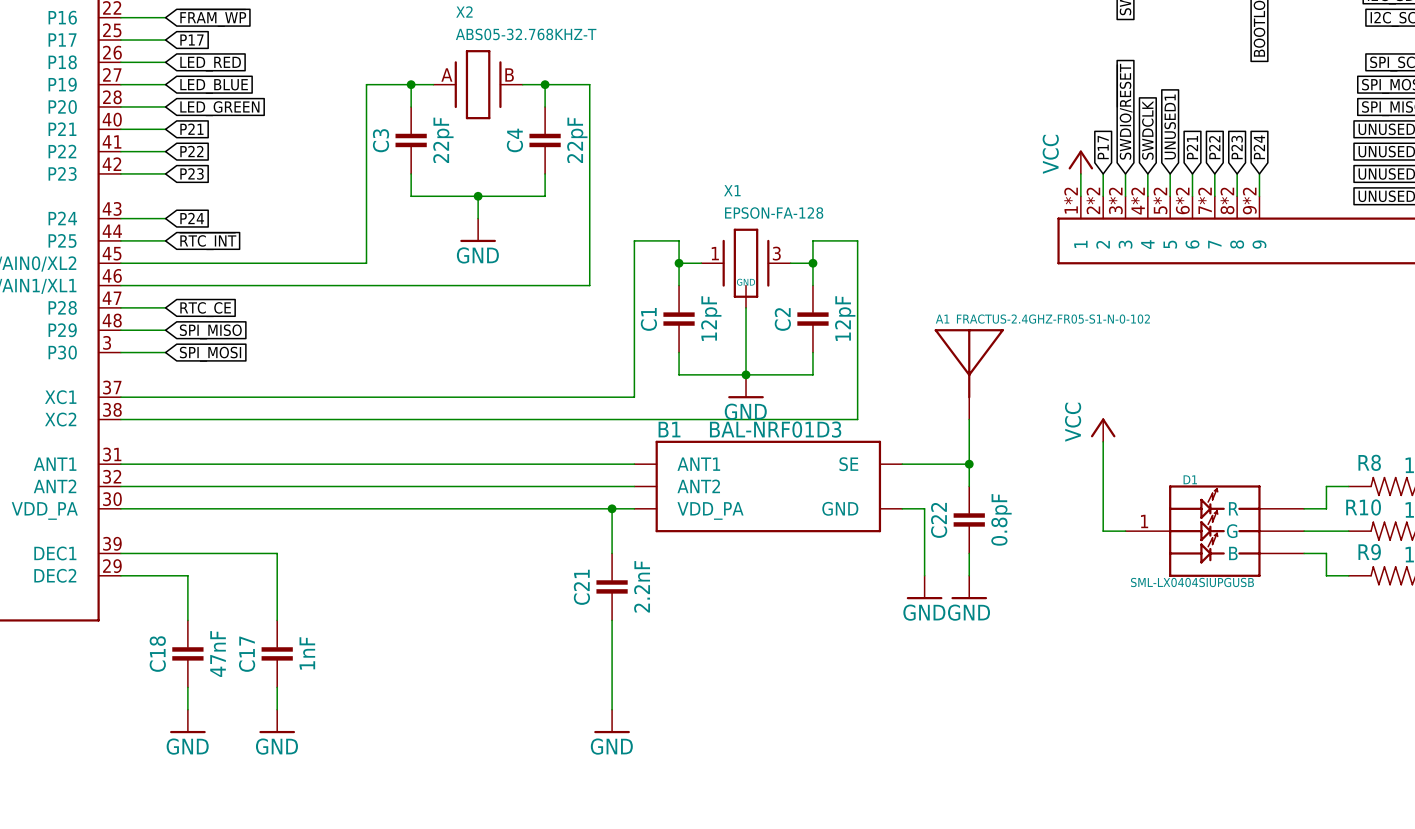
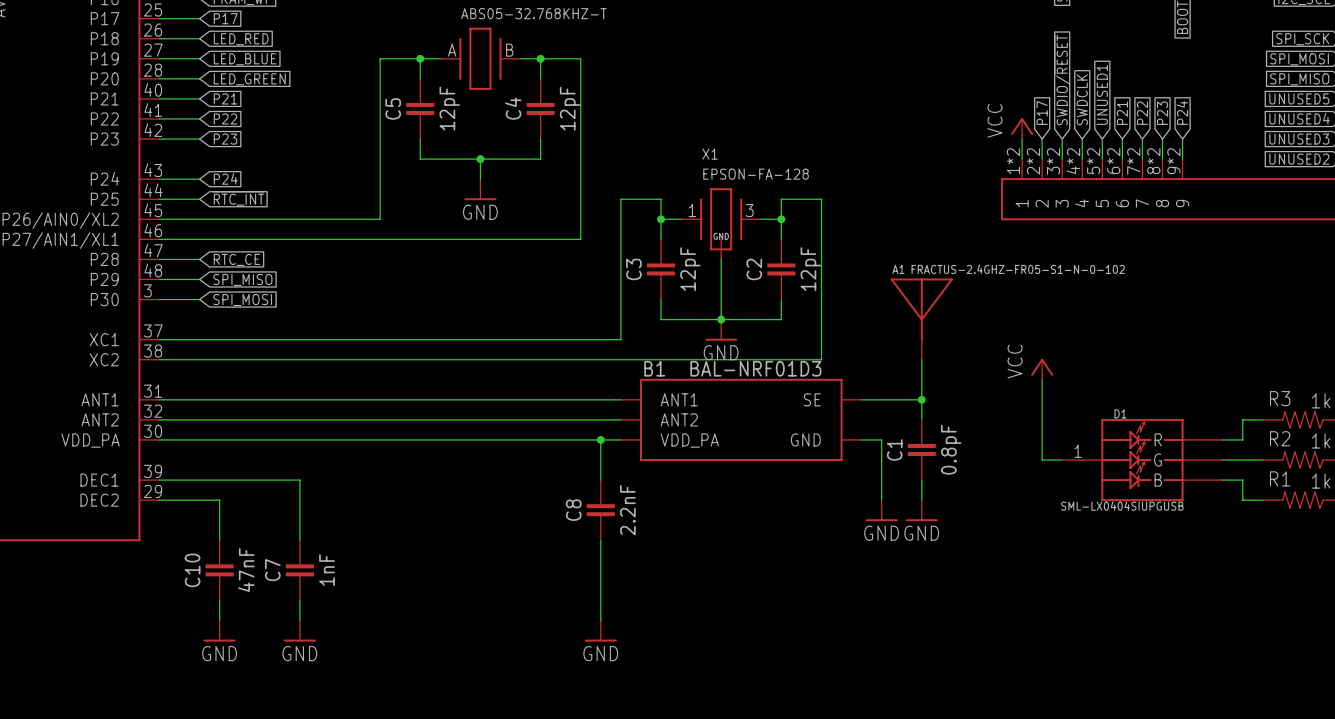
C3 name: C3 (381, 140) -> C5 (393, 108)
C3 value: 22pF (443, 140) -> 12pF (449, 108)
C4 value: 22pF (577, 140) -> 12pF (570, 108)
C1 name: C1 (648, 319) -> C3 (633, 269)
R8 name: R8 (1369, 462) -> R3 (1280, 398)
R10 name: R10 (1363, 507) -> R2 (1280, 438)
C22 name: C22 (939, 520) -> C1 (894, 450)
R9 name: R9 (1369, 552) -> R1 (1280, 478)
C21 name: C21 (581, 587) -> C8 (573, 510)
C18 name: C18 (157, 654) -> C10 (192, 570)
C17 name: C17 (247, 654) -> C7 (272, 570)

